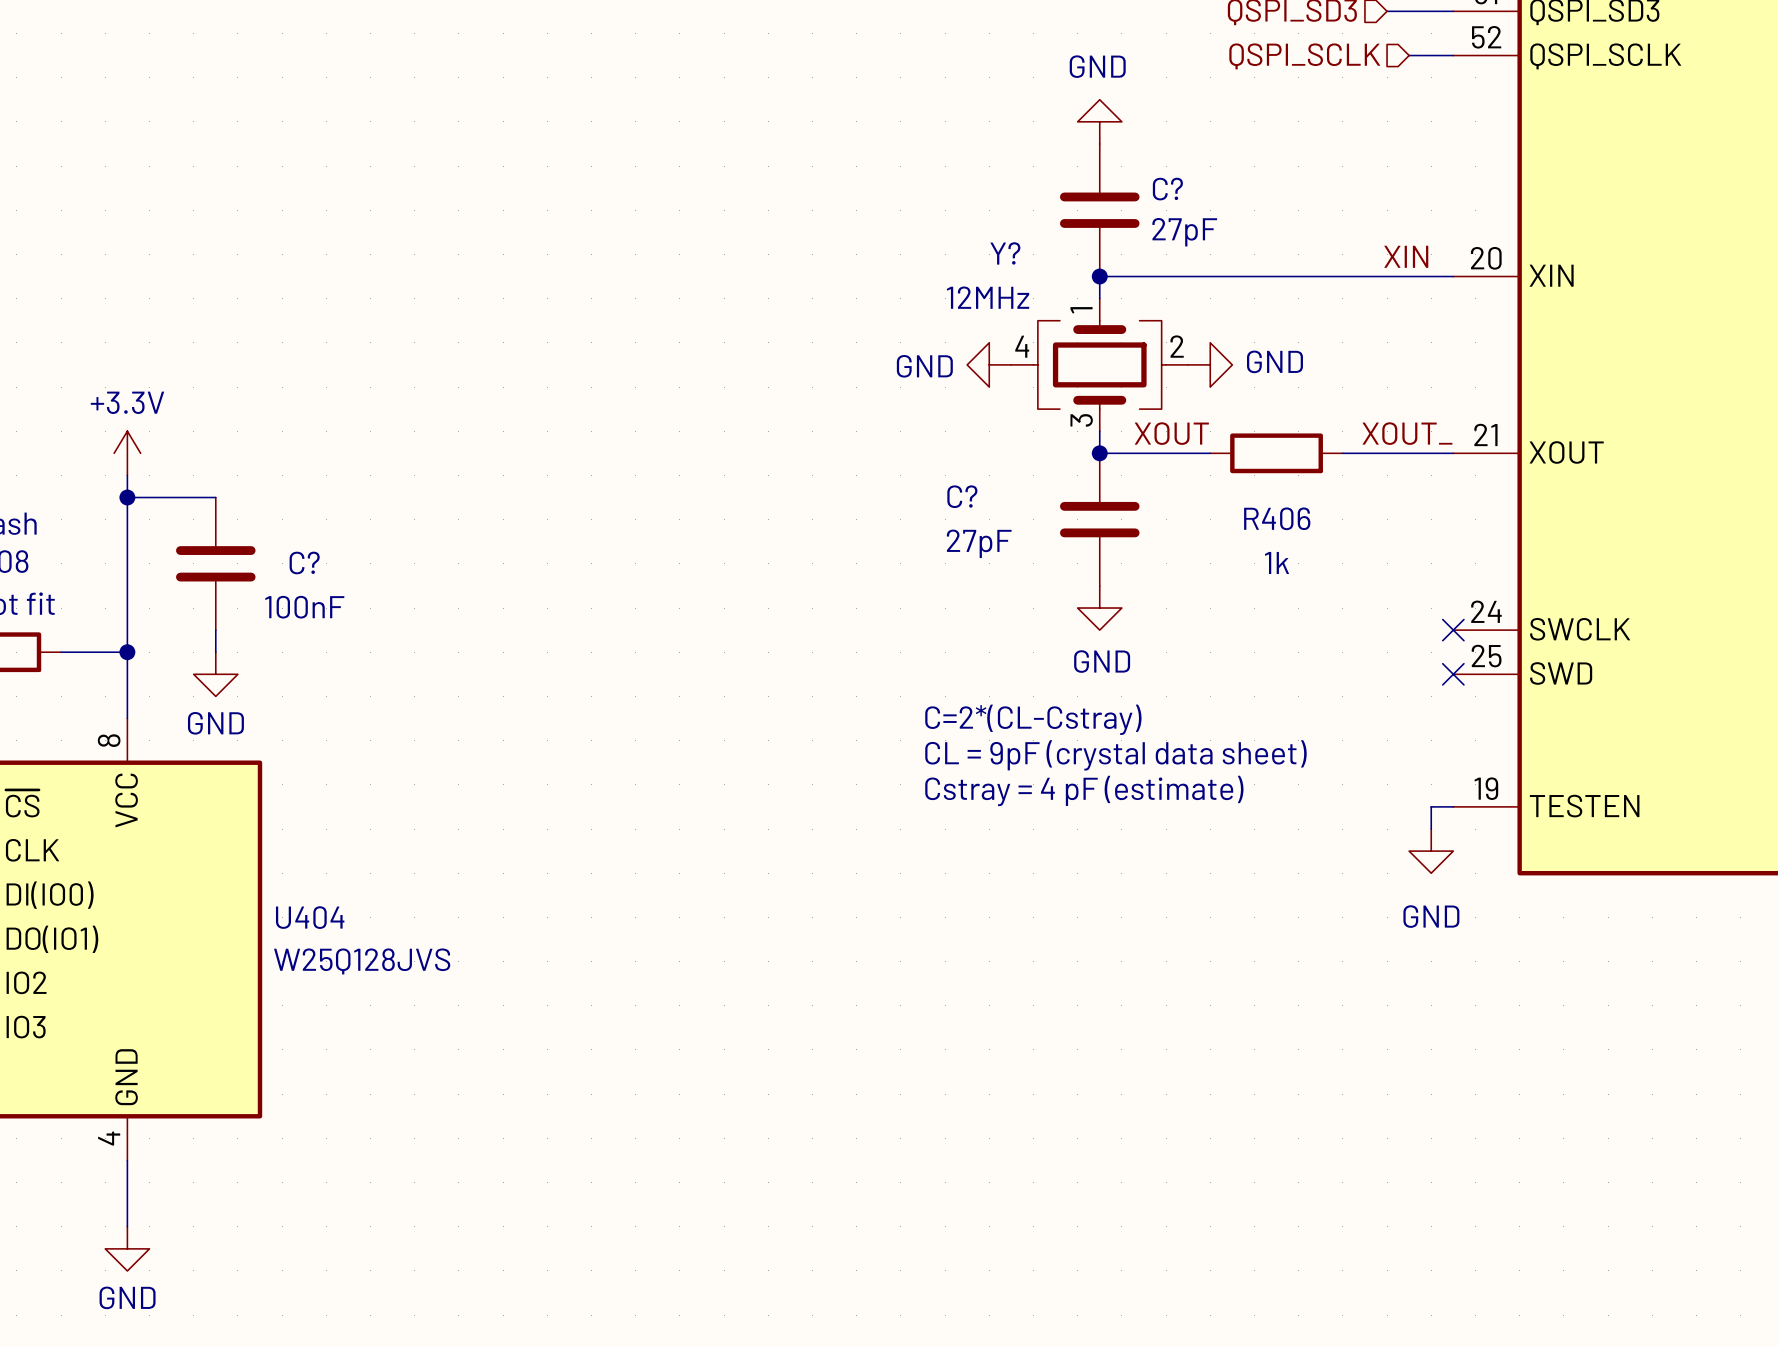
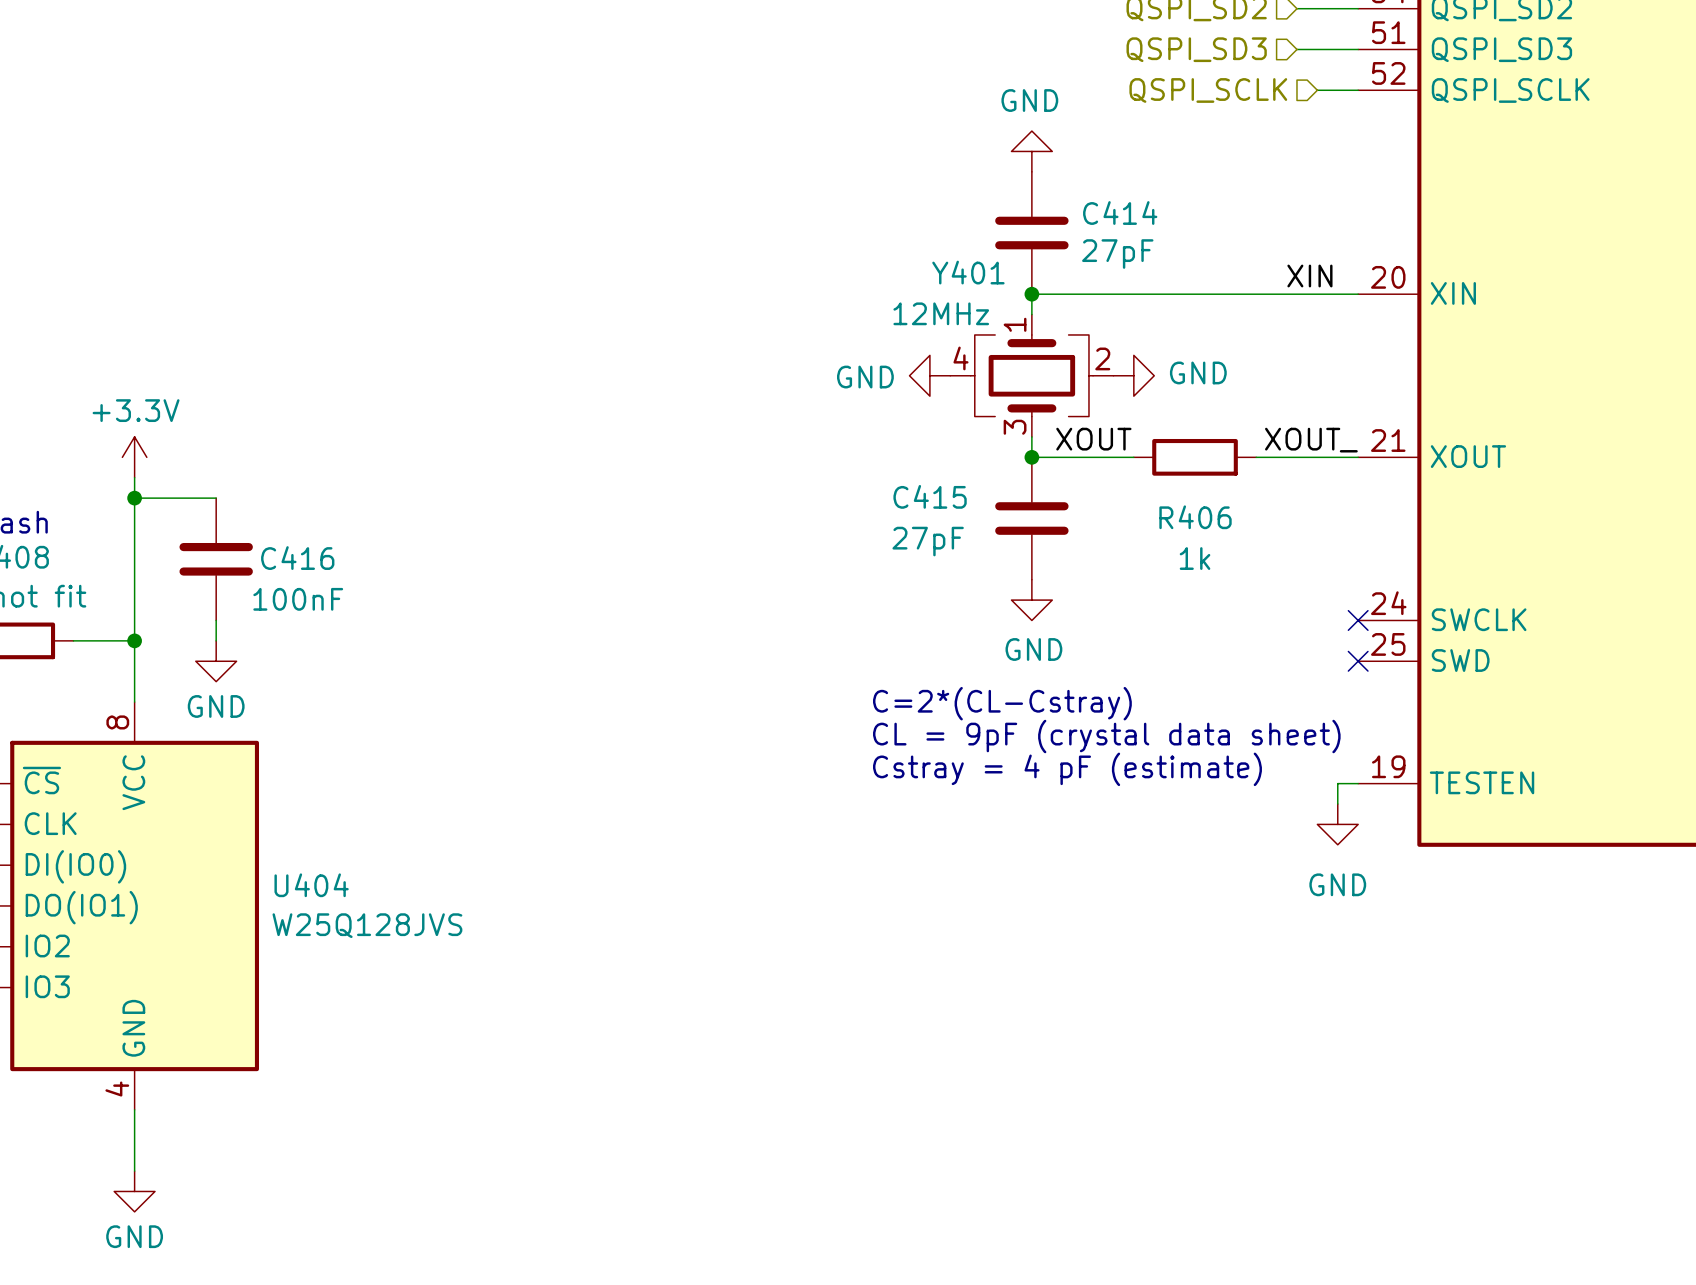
C? name: C? (1167, 189) -> C414 (1120, 213)
Y? name: Y? (1005, 253) -> Y401 (968, 272)
C? name: C? (962, 496) -> C415 (930, 496)
C? name: C? (304, 562) -> C416 (297, 558)

